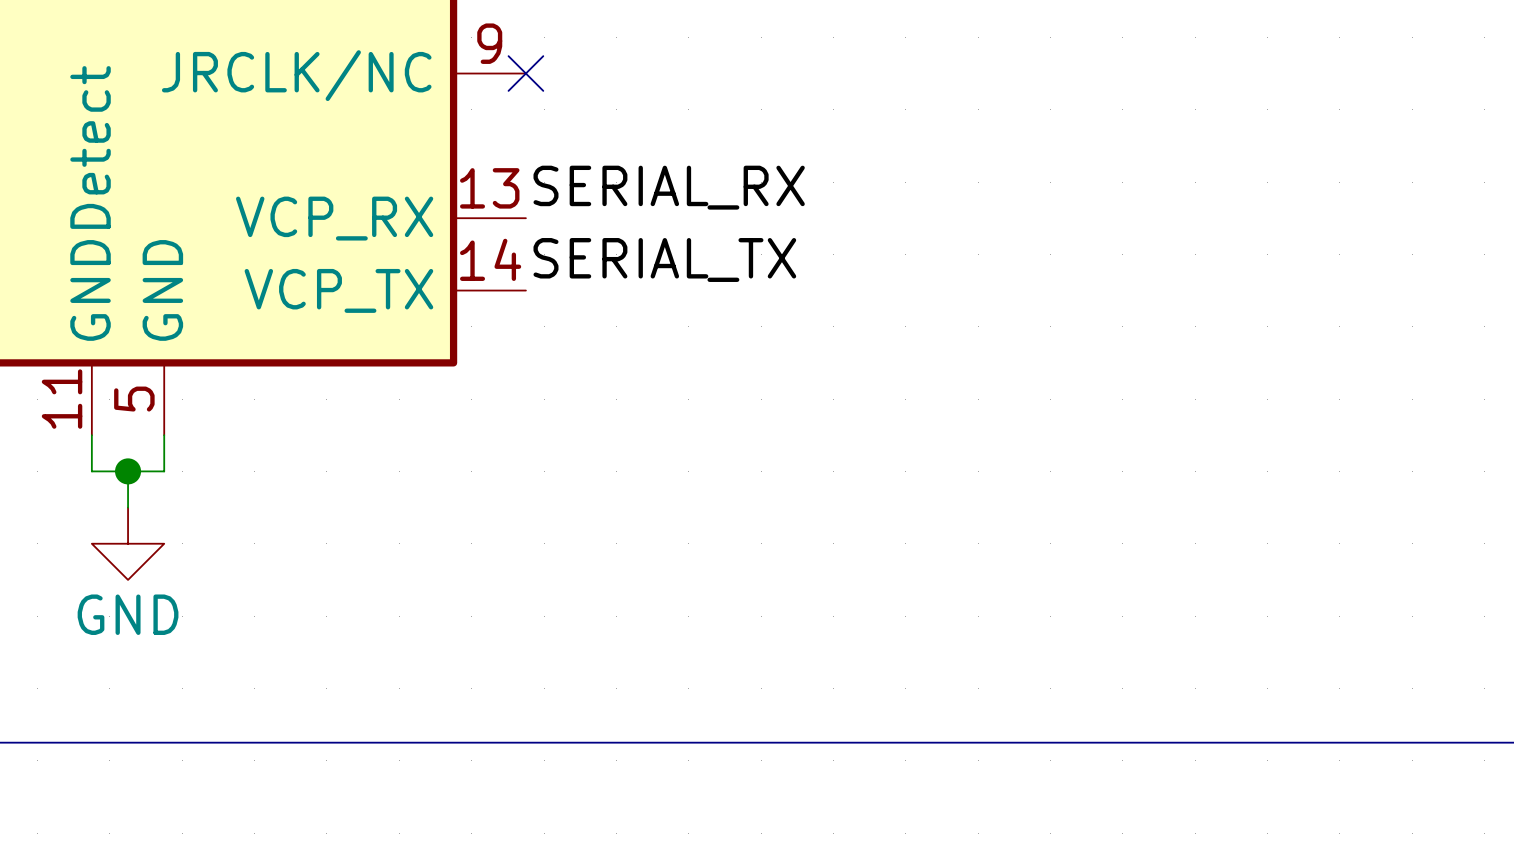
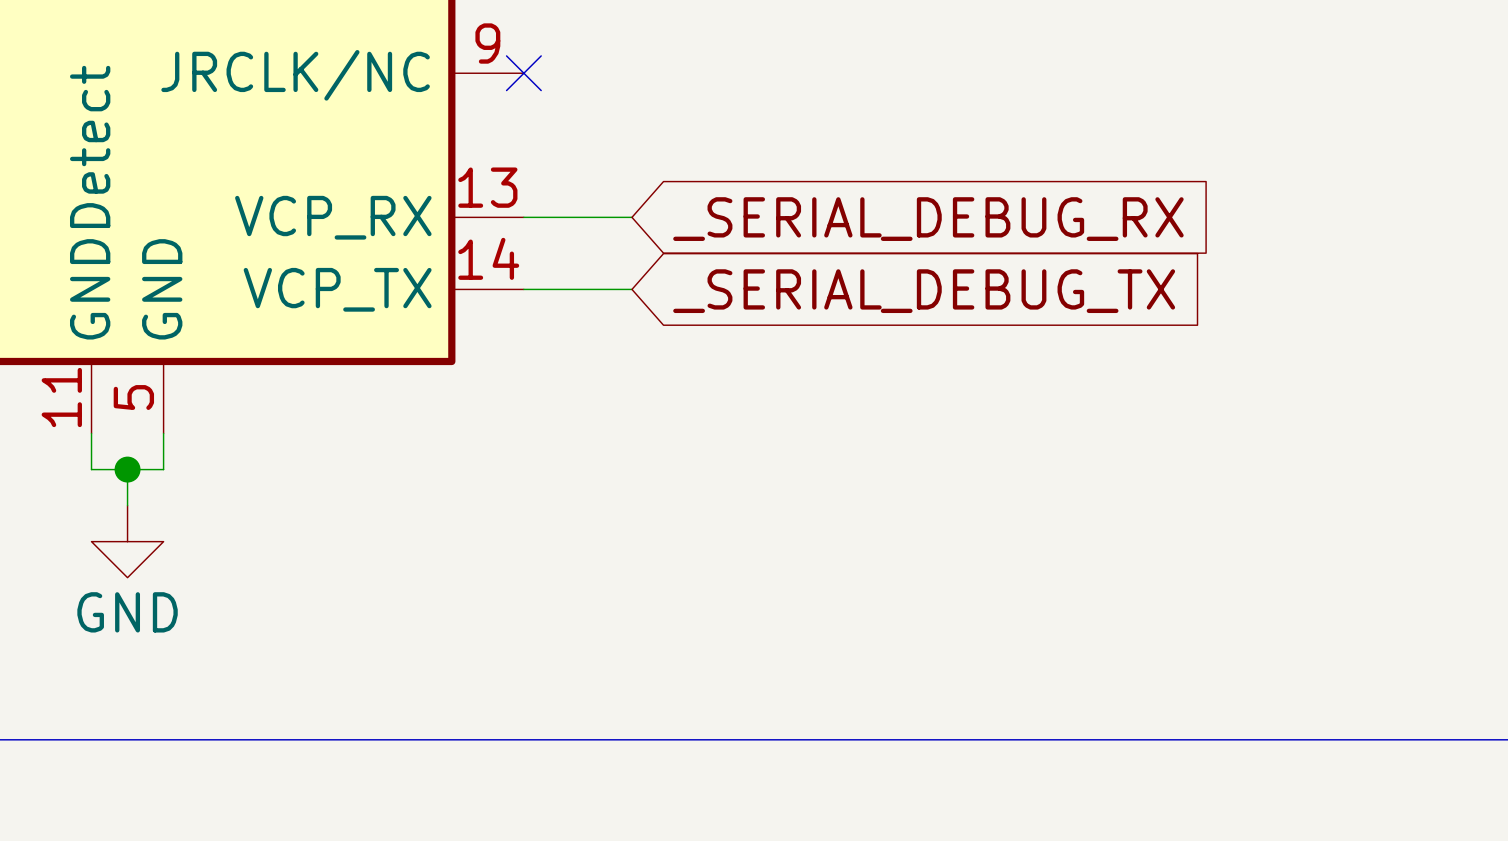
label: SERIAL_RX (669, 187) -> none
wire: none -> (523, 217) (631, 217)
global label: none -> _SERIAL_DEBUG_RX (928, 219)
label: SERIAL_TX (664, 259) -> none
wire: none -> (523, 289) (631, 289)
global label: none -> _SERIAL_DEBUG_TX (924, 291)

